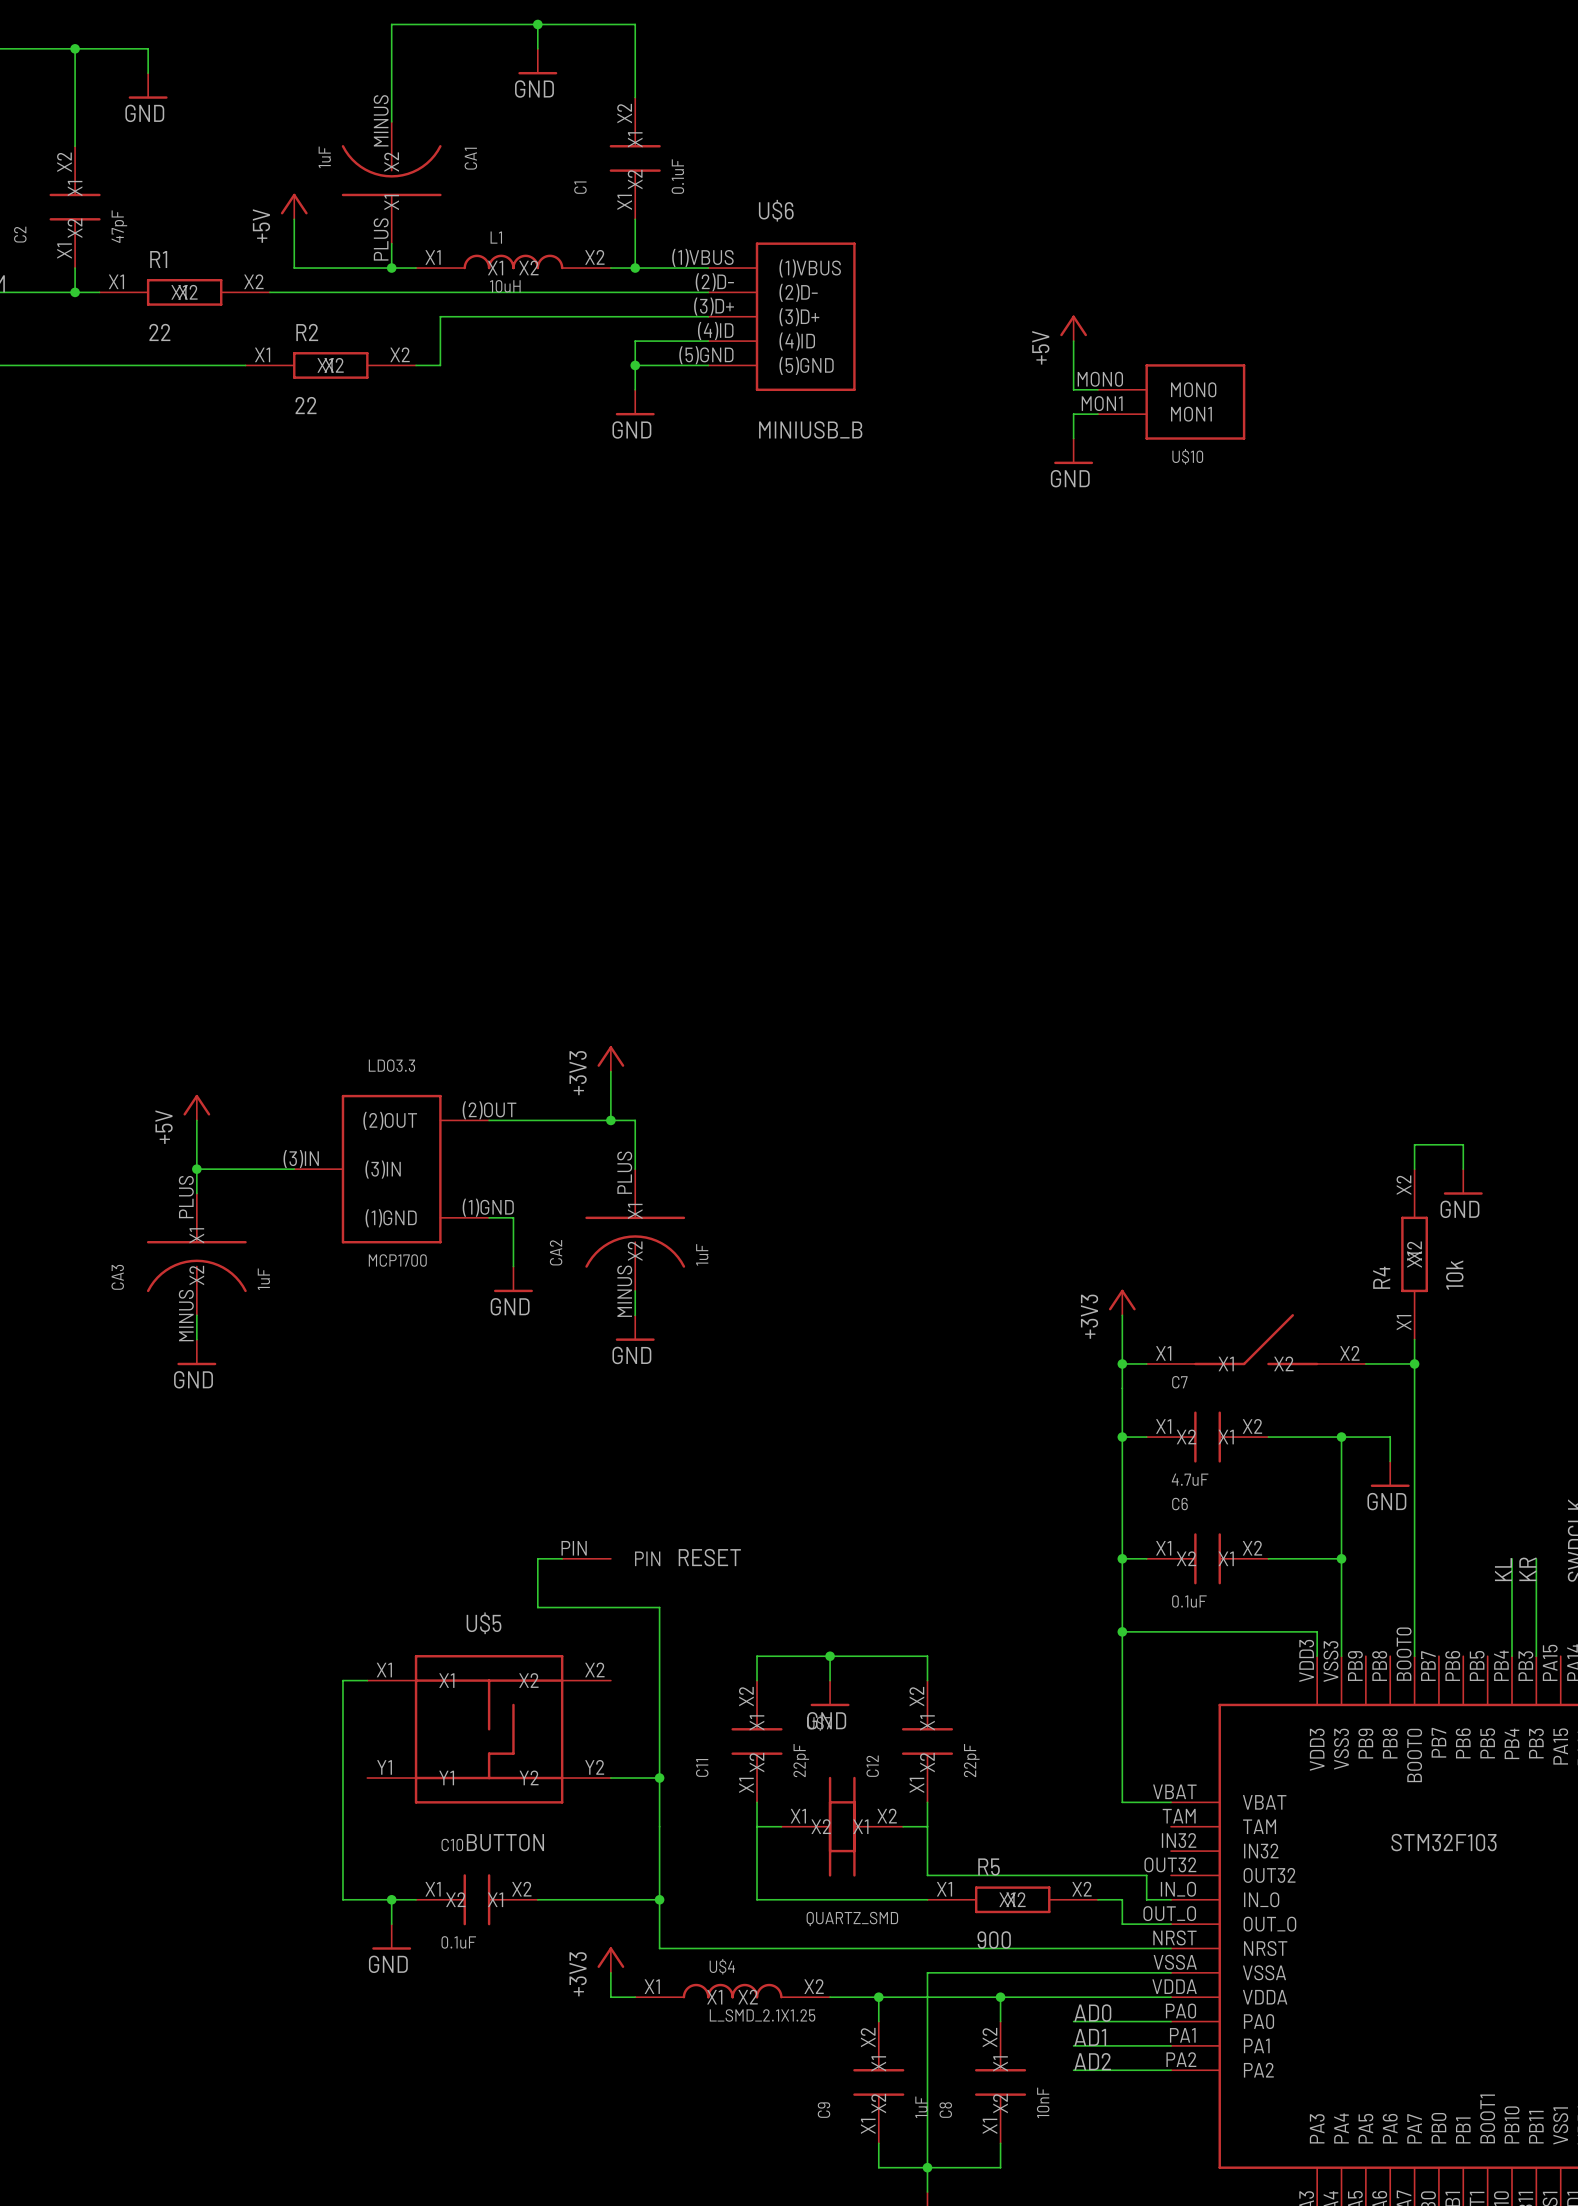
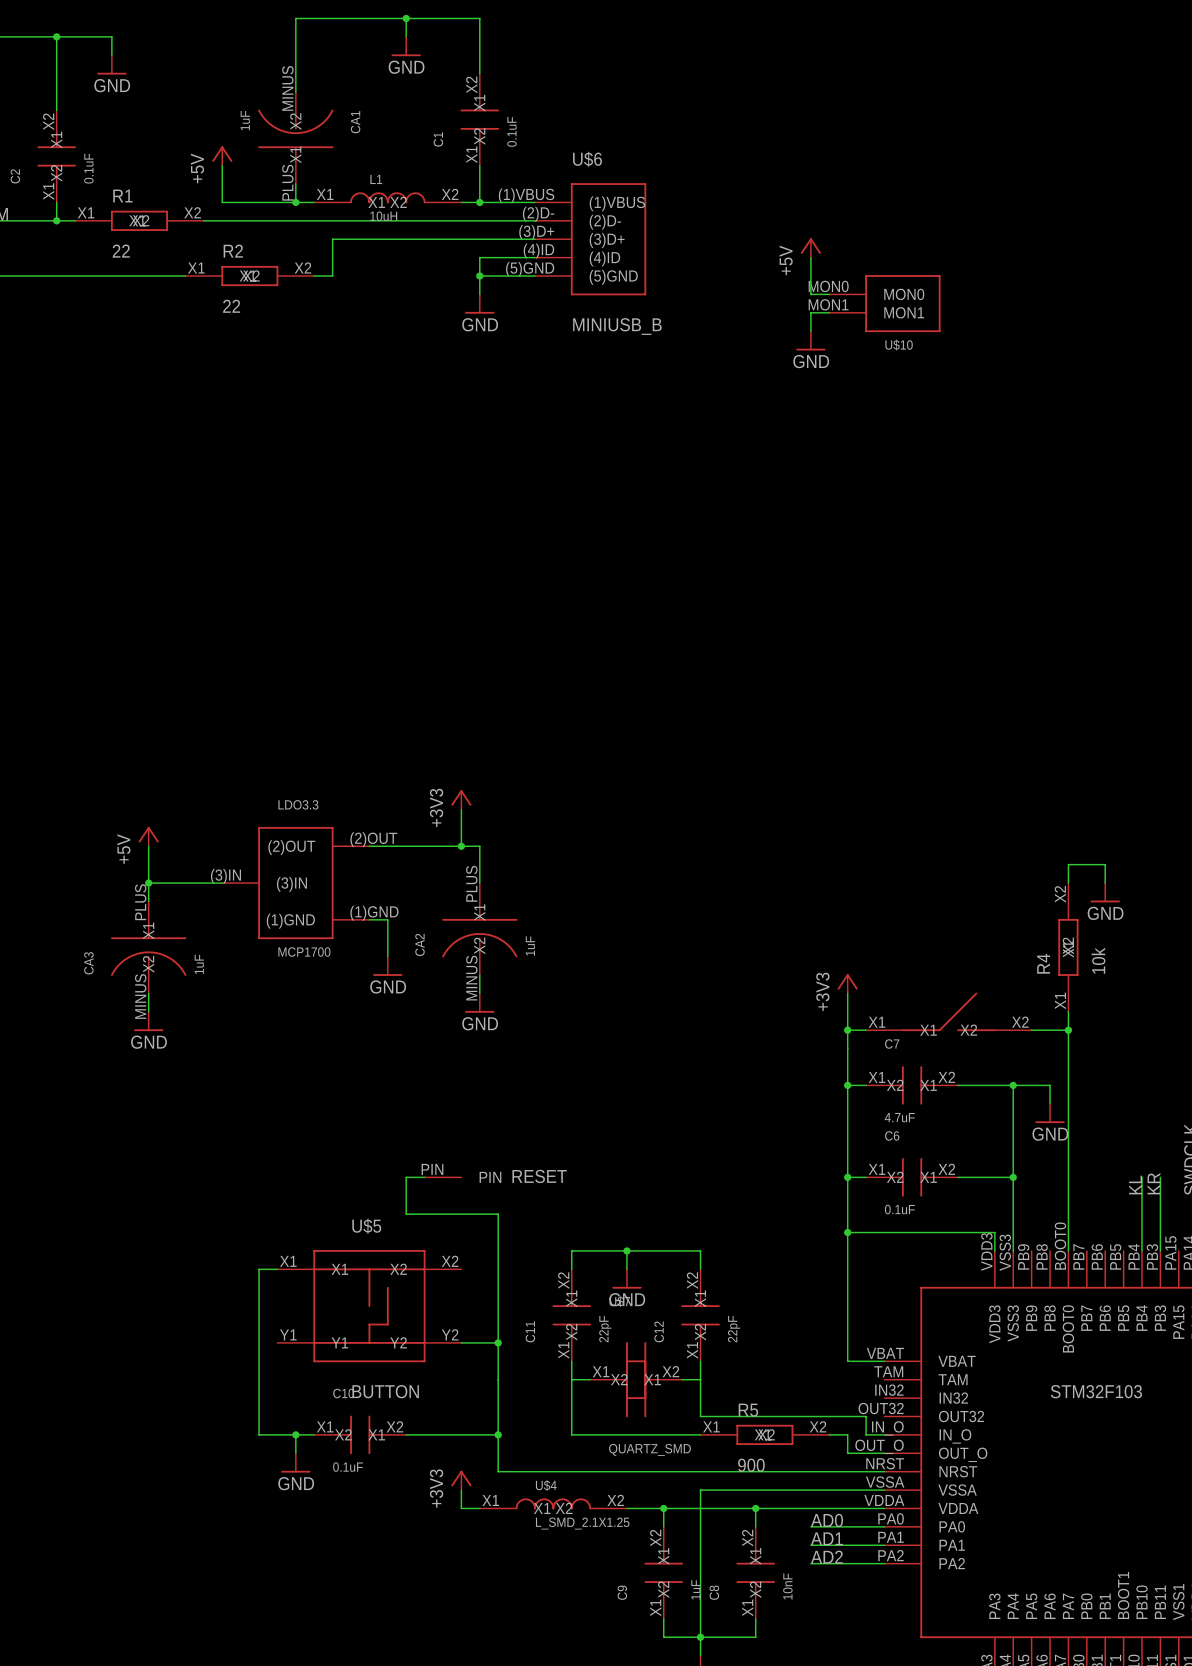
C2 value: 47pF (119, 226) -> 0.1uF (88, 168)

